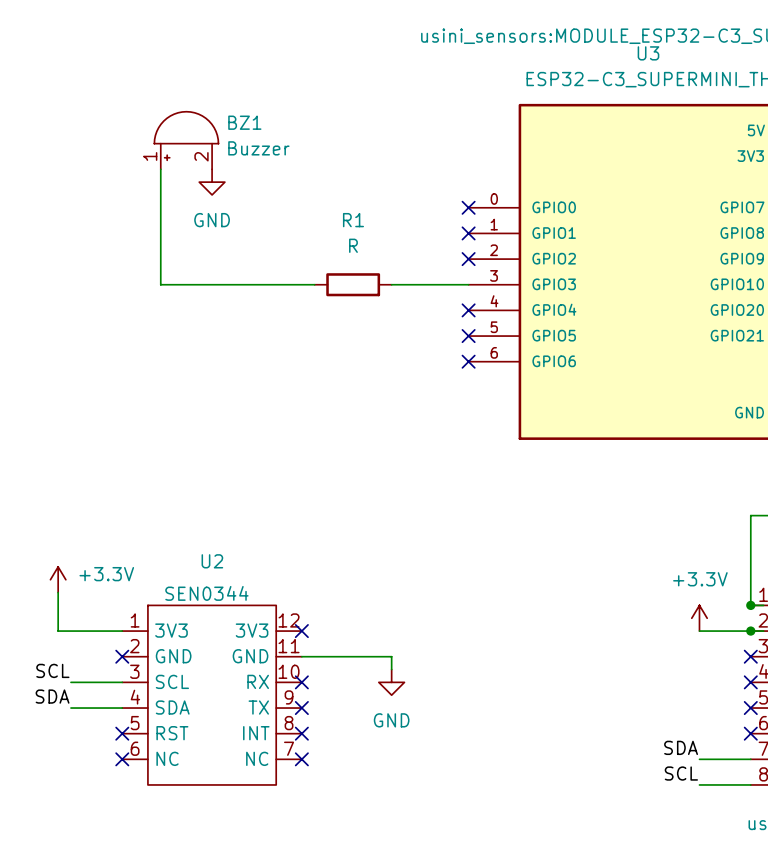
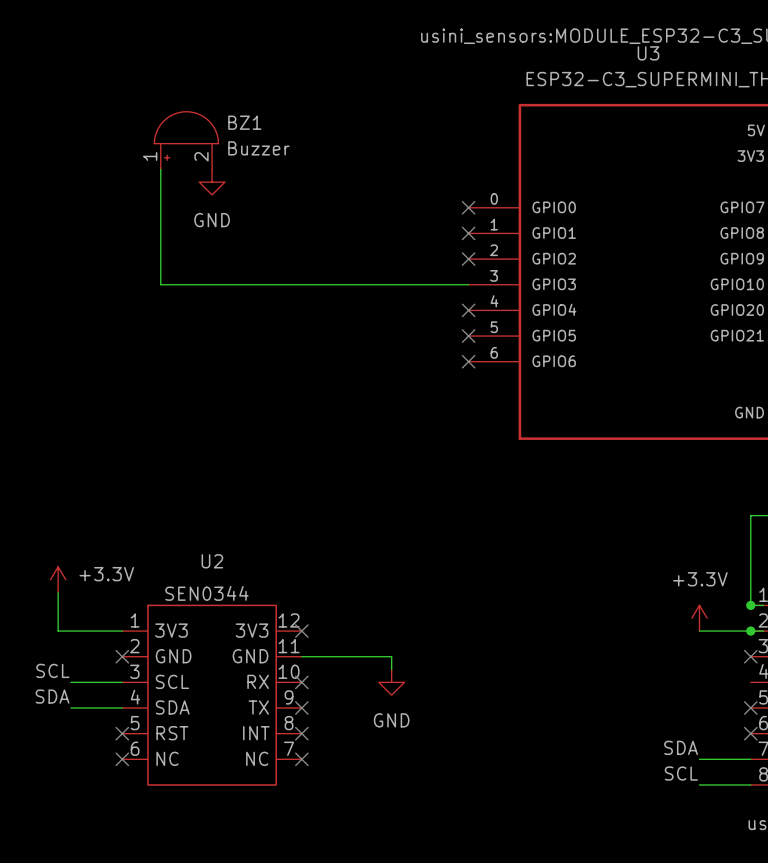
wire: none -> (314, 284) (391, 284)
R1: R (353, 284) -> none
no-connect mark: (750, 682) -> none

